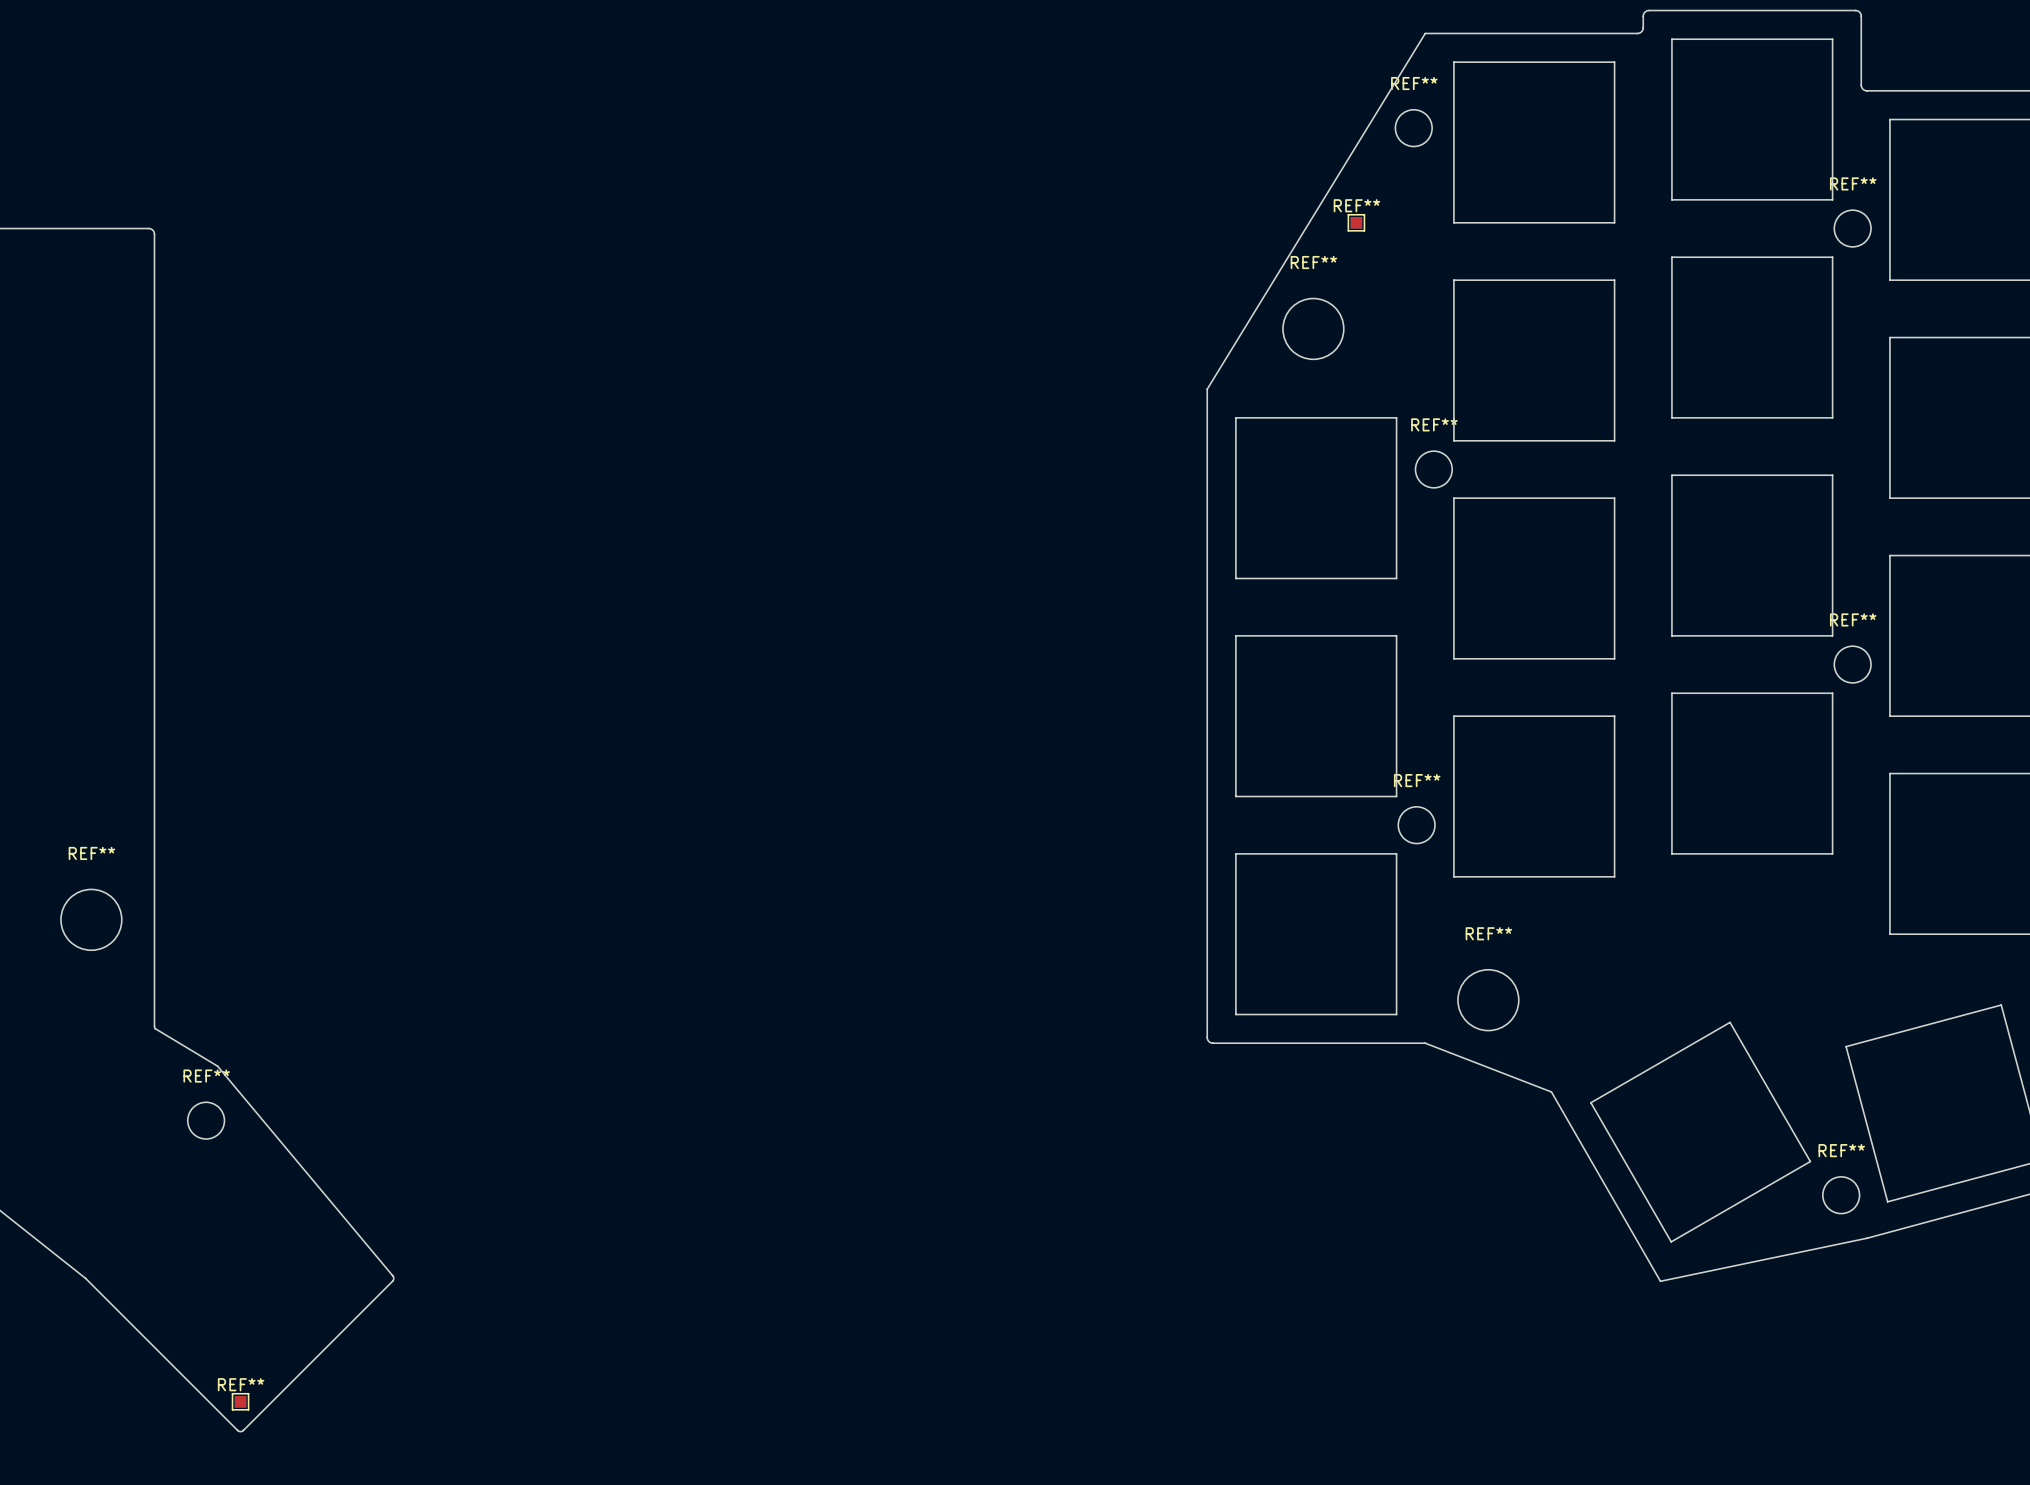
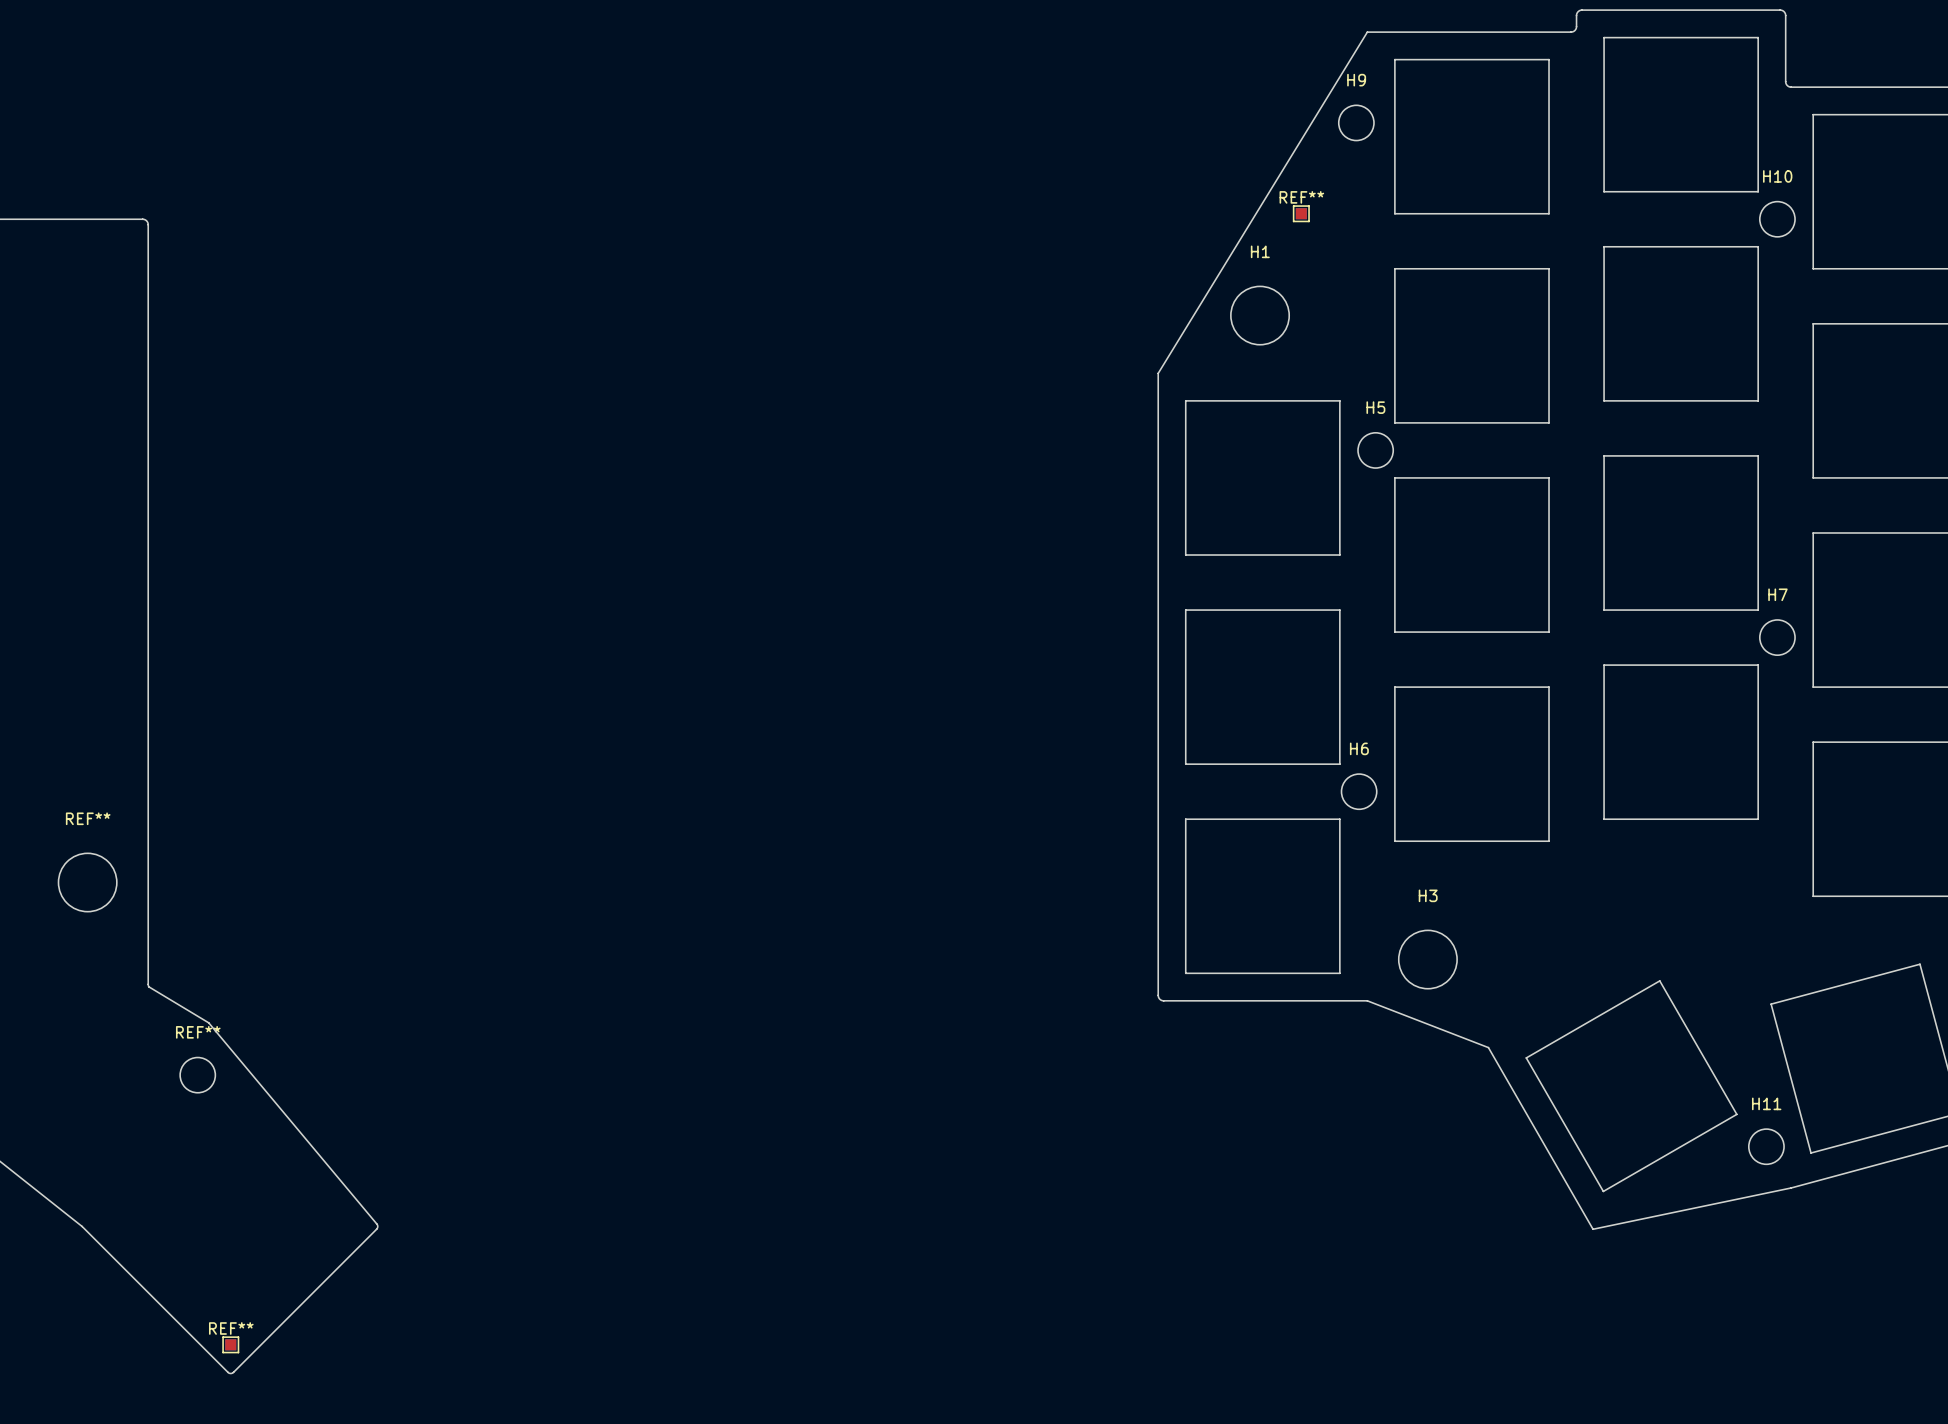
REF** name: REF** (1414, 83) -> H9 (1356, 80)
REF** name: REF** (1853, 183) -> H10 (1777, 176)
REF** name: REF** (1313, 262) -> H1 (1260, 251)
REF** name: REF** (1434, 424) -> H5 (1375, 407)
REF** name: REF** (1853, 619) -> H7 (1777, 594)
REF** name: REF** (1417, 780) -> H6 (1359, 748)
REF** name: REF** (1488, 933) -> H3 (1428, 895)
REF** name: REF** (1841, 1150) -> H11 (1766, 1103)

